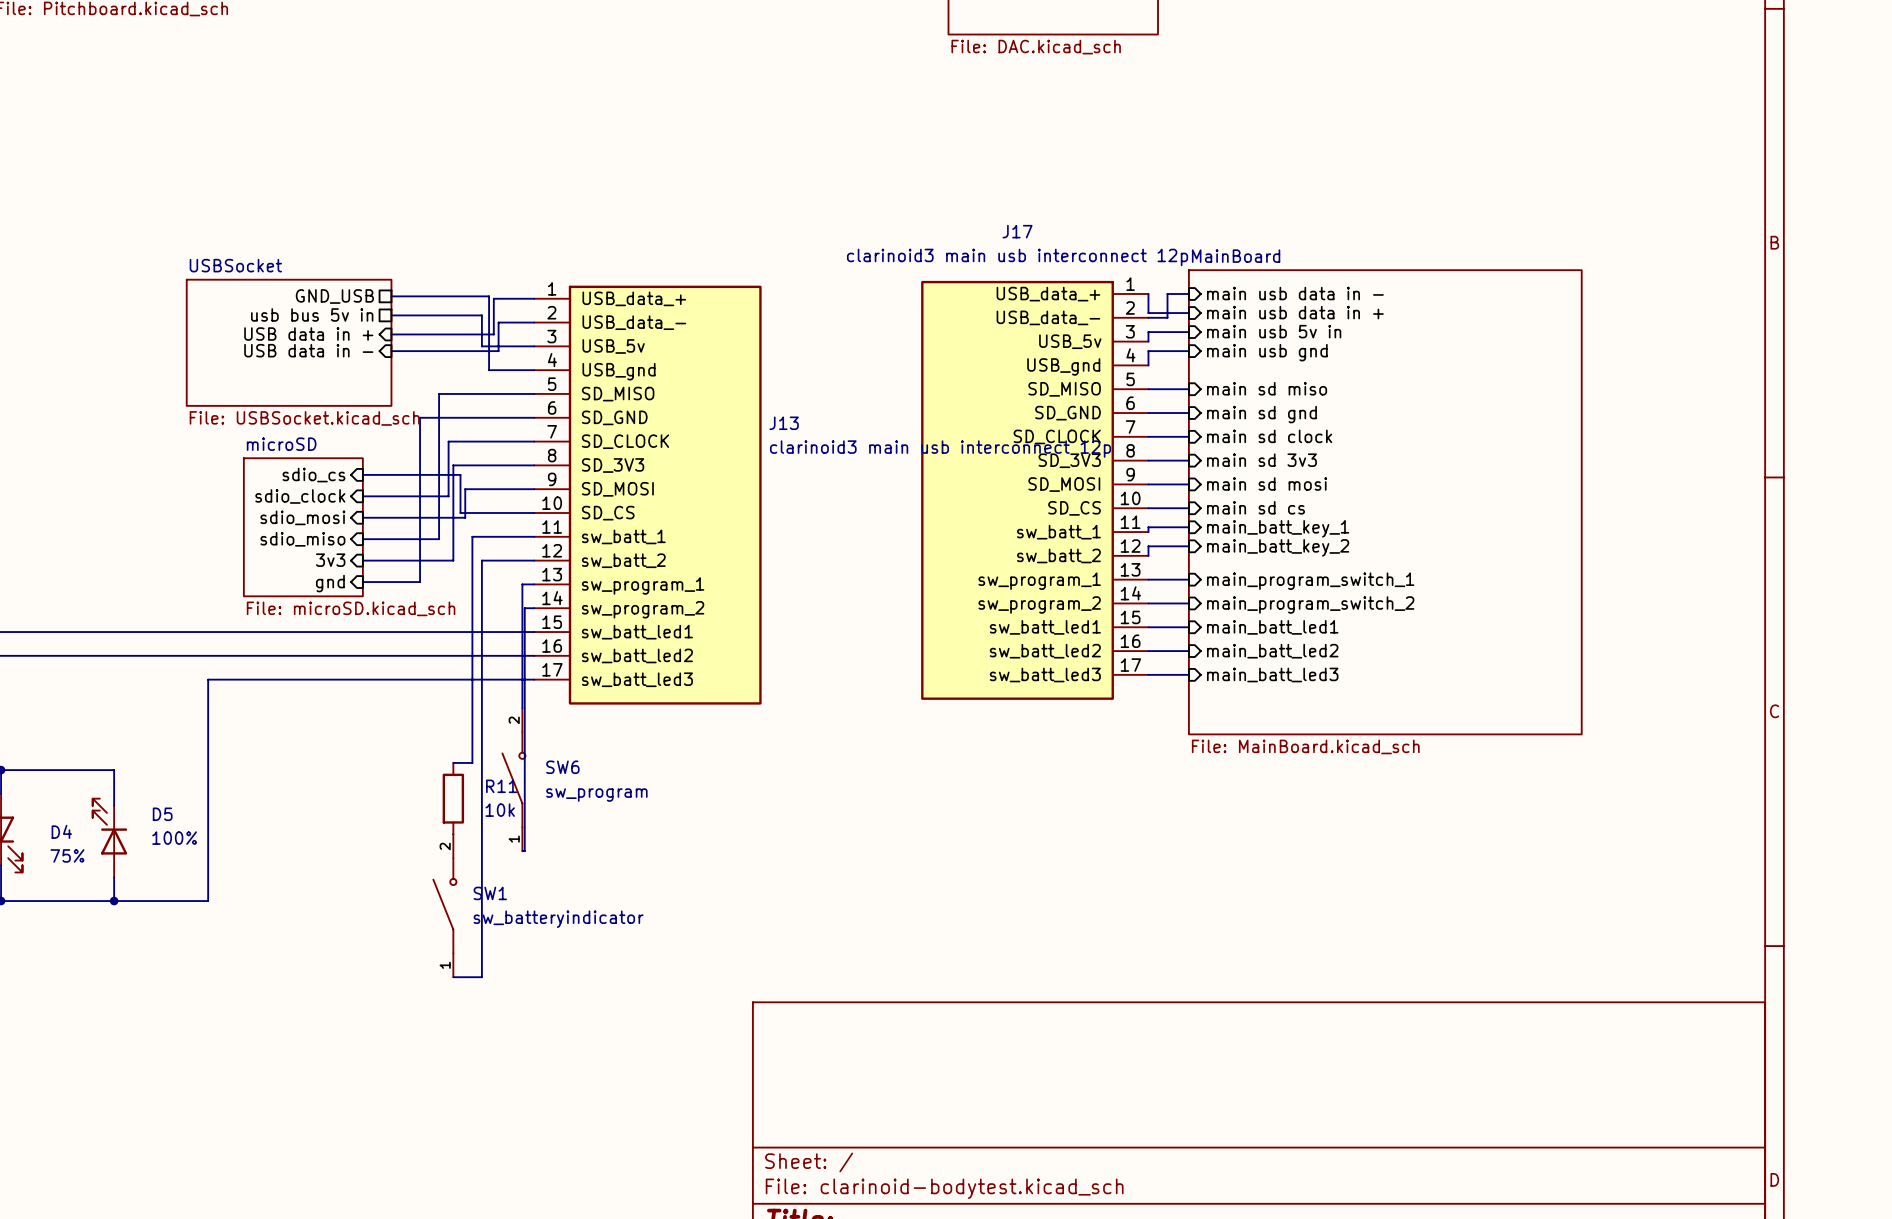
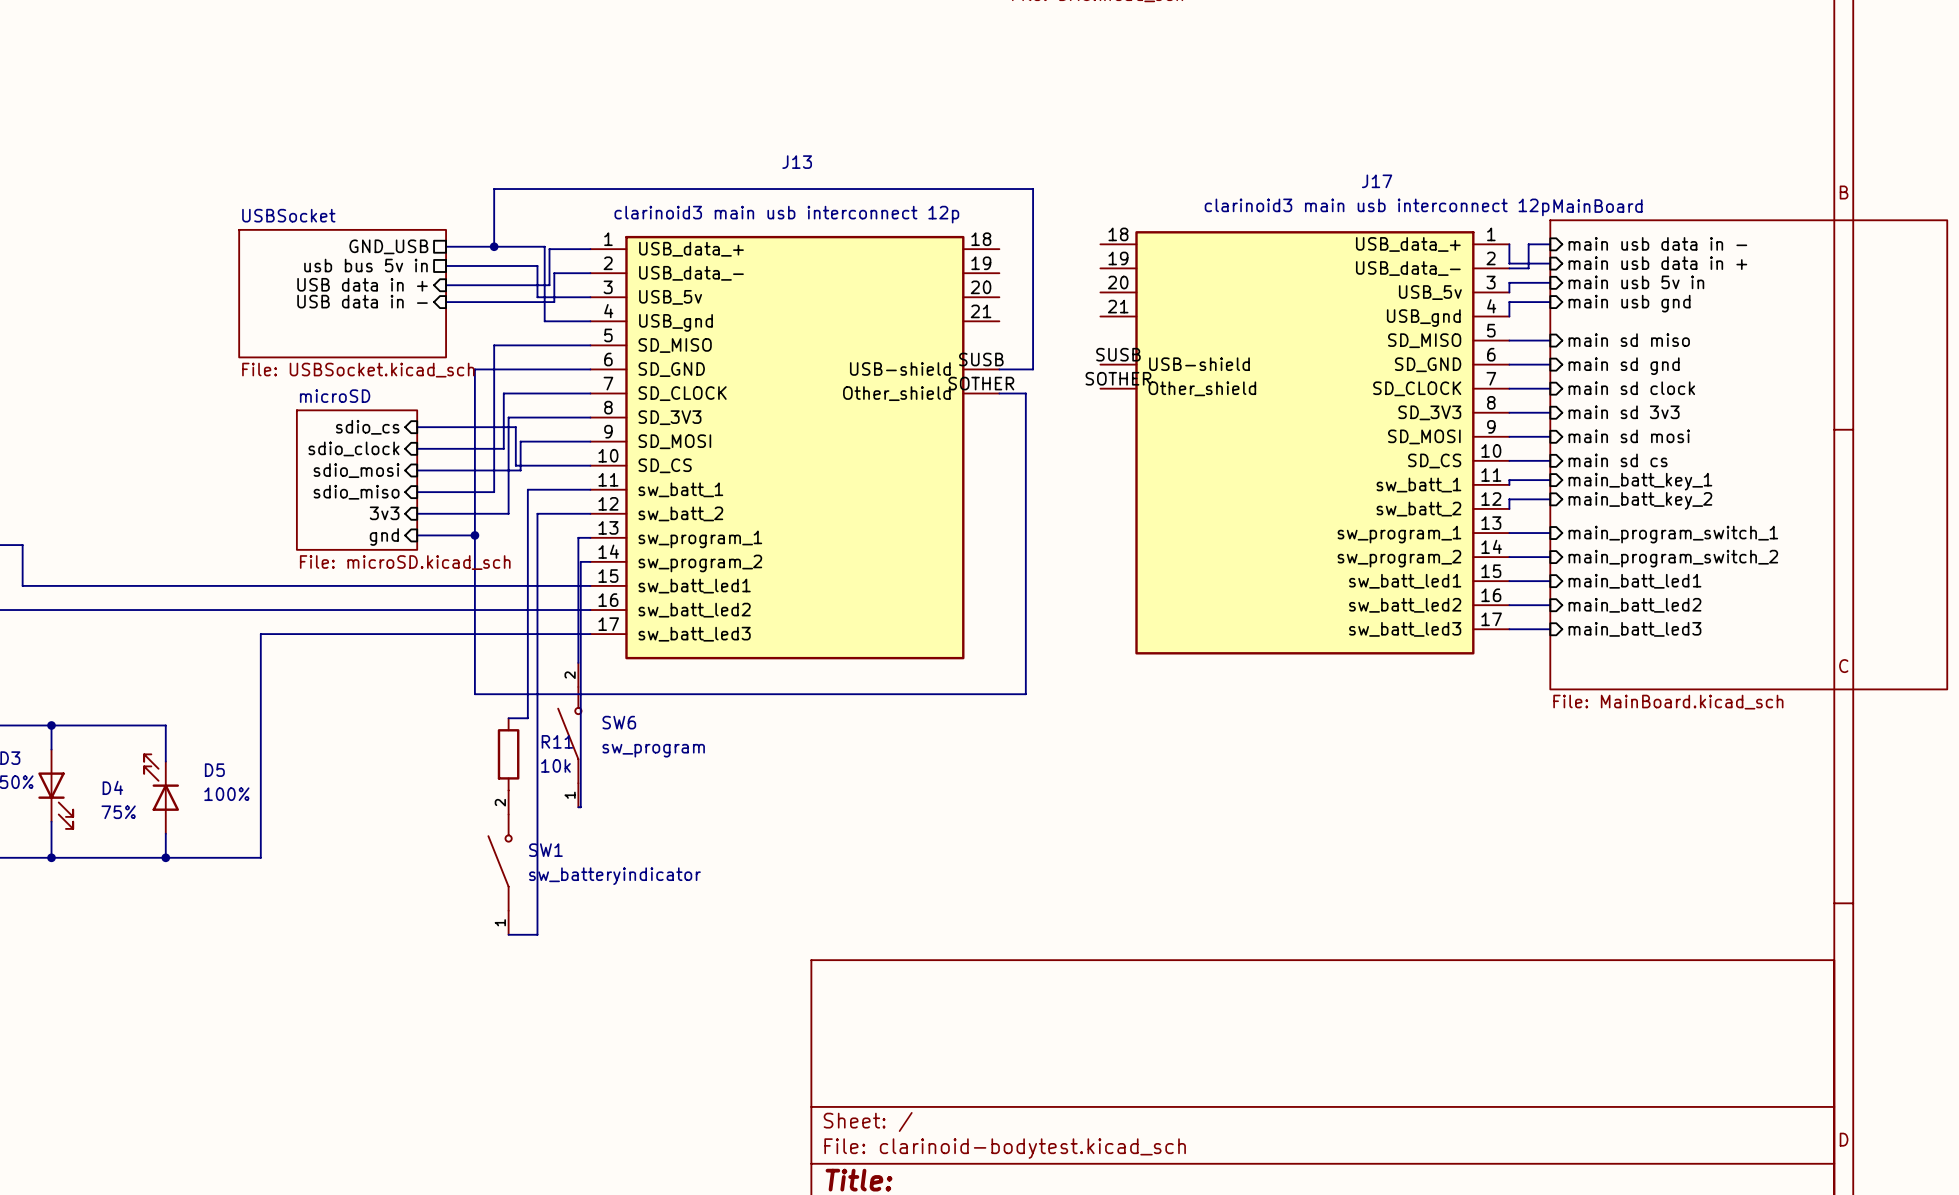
J17 name position: J17 (1017, 231) -> J17 (1377, 181)
J17 value position: clarinoid3 main usb interconnect 12p (1017, 257) -> clarinoid3 main usb interconnect 12p (1377, 207)
J17 symbol: [921, 280, 1149, 700] -> [1100, 231, 1510, 655]
J13 symbol: [534, 285, 762, 705] -> [590, 235, 1000, 660]
sheet pin: main usb data in - (1295, 293) -> none
wire: none -> (1509, 244) (1509, 263) (1550, 263)
wire: none -> (1550, 244) (1528, 244) (1528, 268) (1509, 268)
sheet pin: none -> main usb data in - (1657, 243)
wire: none -> (494, 246) (494, 189) (1033, 189) (1033, 369) (999, 369)
junction: none -> (494, 246)
sheet pin: main usb data in + (1295, 312) -> none
sheet pin: none -> main usb data in + (1657, 263)
sheet pin: main usb 5v in (1274, 331) -> none
sheet pin: none -> main usb 5v in (1636, 282)
wire: none -> (1550, 282) (1509, 282) (1509, 292)
wire: none -> (1550, 302) (1509, 302) (1509, 316)
sheet pin: main usb gnd (1267, 352) -> none
sheet pin: none -> main usb gnd (1629, 303)
sheet pin: main sd miso (1267, 388) -> none
sheet pin: none -> main sd miso (1629, 340)
wire: none -> (1509, 340) (1550, 340)
wire: none -> (1509, 364) (1550, 364)
sheet pin: main sd gnd (1261, 414) -> none
sheet pin: none -> main sd gnd (1624, 366)
J13 name position: J13 (784, 423) -> J13 (797, 162)
sheet pin: main sd clock (1269, 436) -> none
wire: none -> (1509, 388) (1550, 388)
sheet pin: none -> main sd clock (1631, 388)
wire: none -> (999, 393) (1025, 393) (1025, 694) (474, 694) (474, 535)
J13 value position: clarinoid3 main usb interconnect 12p (940, 449) -> clarinoid3 main usb interconnect 12p (786, 214)
sheet pin: main sd 3v3 (1261, 460) -> none
wire: none -> (1509, 412) (1550, 412)
sheet pin: none -> main sd 3v3 (1624, 412)
sheet pin: main sd mosi (1267, 483) -> none
sheet pin: none -> main sd mosi (1629, 436)
wire: none -> (1509, 436) (1550, 436)
sheet MainBoard: File: MainBoard.kicad_sch (1385, 502) -> none
sheet MainBoard: none -> File: MainBoard.kicad_sch (1748, 454)
sheet pin: main sd cs (1256, 507) -> none
sheet pin: none -> main sd cs (1618, 460)
wire: none -> (1509, 460) (1550, 460)
wire: none -> (1550, 480) (1509, 480) (1509, 484)
sheet pin: main_batt_key_1 (1278, 528) -> none
sheet pin: none -> main_batt_key_1 (1640, 481)
wire: none -> (1550, 499) (1509, 499) (1509, 508)
sheet pin: main_batt_key_2 (1278, 547) -> none
sheet pin: none -> main_batt_key_2 (1640, 500)
wire: none -> (1509, 533) (1550, 533)
sheet pin: main_program_switch_1 (1310, 581) -> none
sheet pin: none -> main_program_switch_1 (1673, 534)
junction: none -> (474, 535)
wire: none -> (1509, 557) (1550, 557)
sheet pin: main_program_switch_2 (1310, 605) -> none
sheet pin: none -> main_program_switch_2 (1673, 558)
sheet pin: main_batt_led1 (1272, 627) -> none
wire: none -> (1509, 581) (1550, 581)
sheet pin: none -> main_batt_led1 (1634, 581)
sheet pin: main_batt_led2 (1272, 651) -> none
wire: none -> (1509, 605) (1550, 605)
sheet pin: none -> main_batt_led2 (1634, 605)
sheet pin: main_batt_led3 (1272, 674) -> none
wire: none -> (1509, 629) (1550, 629)
sheet pin: none -> main_batt_led3 (1634, 629)

